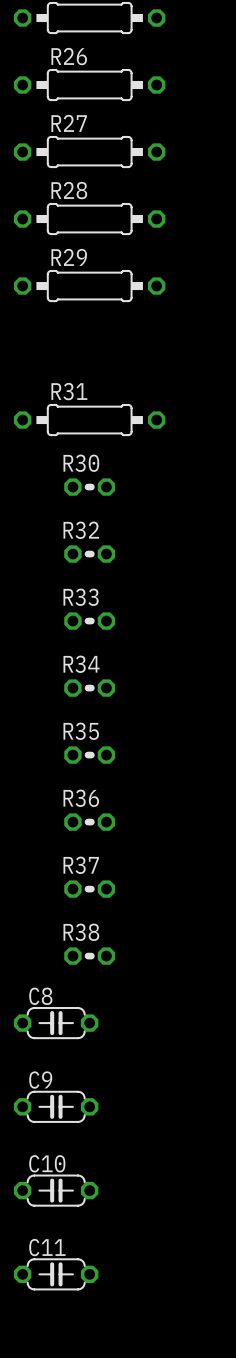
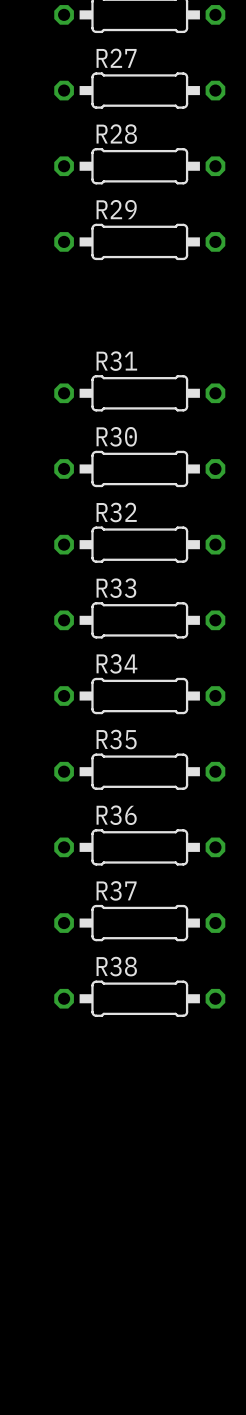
R30 footprint: [64, 478, 116, 496] -> [54, 450, 226, 488]
R32 footprint: [64, 545, 116, 563] -> [54, 526, 226, 563]
R33 footprint: [64, 612, 116, 630] -> [54, 602, 226, 639]
R34 footprint: [64, 679, 116, 697] -> [54, 677, 226, 715]
R35 footprint: [64, 746, 116, 764] -> [54, 753, 226, 790]
R36 footprint: [64, 813, 116, 831] -> [54, 829, 226, 866]
R37 footprint: [64, 880, 116, 898] -> [54, 904, 226, 942]
R38 footprint: [64, 947, 116, 965] -> [54, 980, 226, 1017]
C8: (56, 1023) -> none
C9: (56, 1106) -> none
C10: (56, 1190) -> none
C11: (56, 1274) -> none

